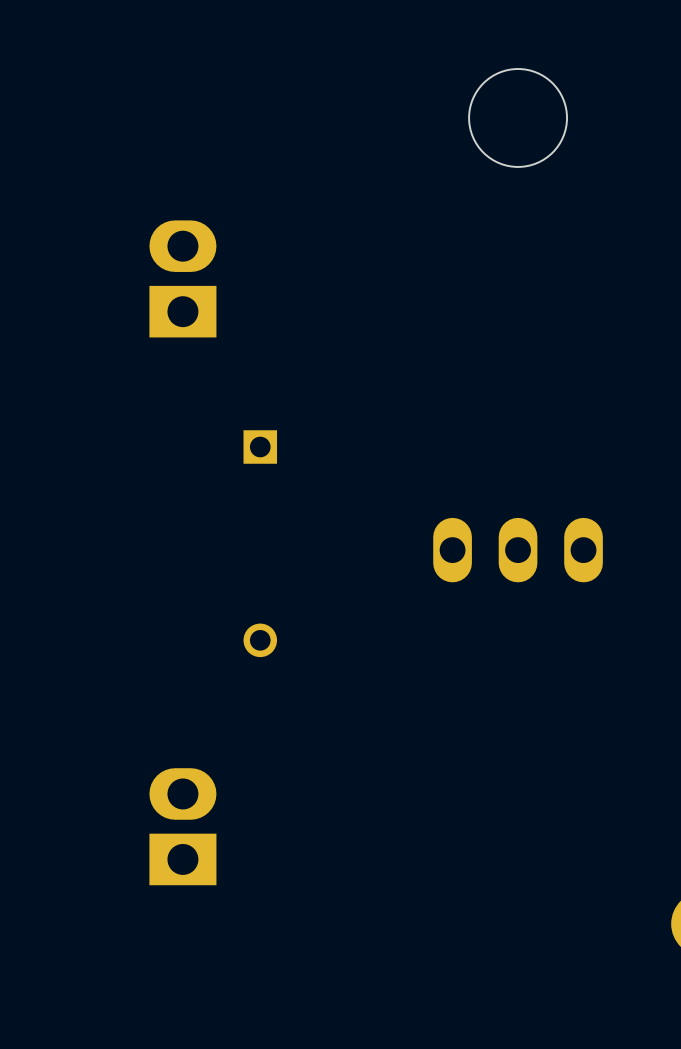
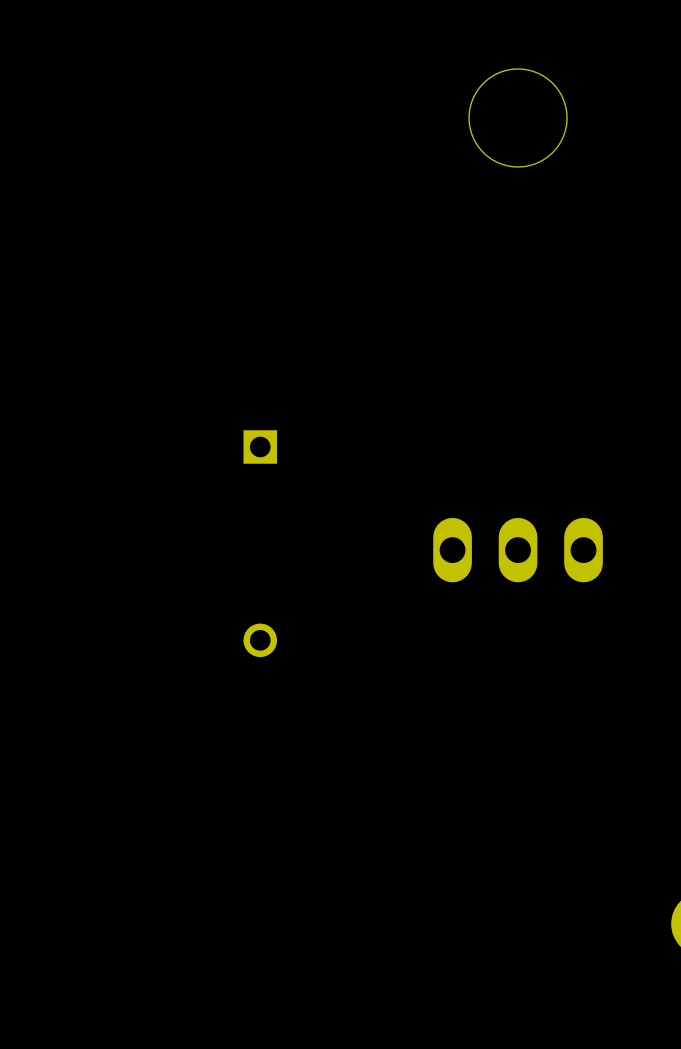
part: (182, 278) -> none
part: (182, 826) -> none

